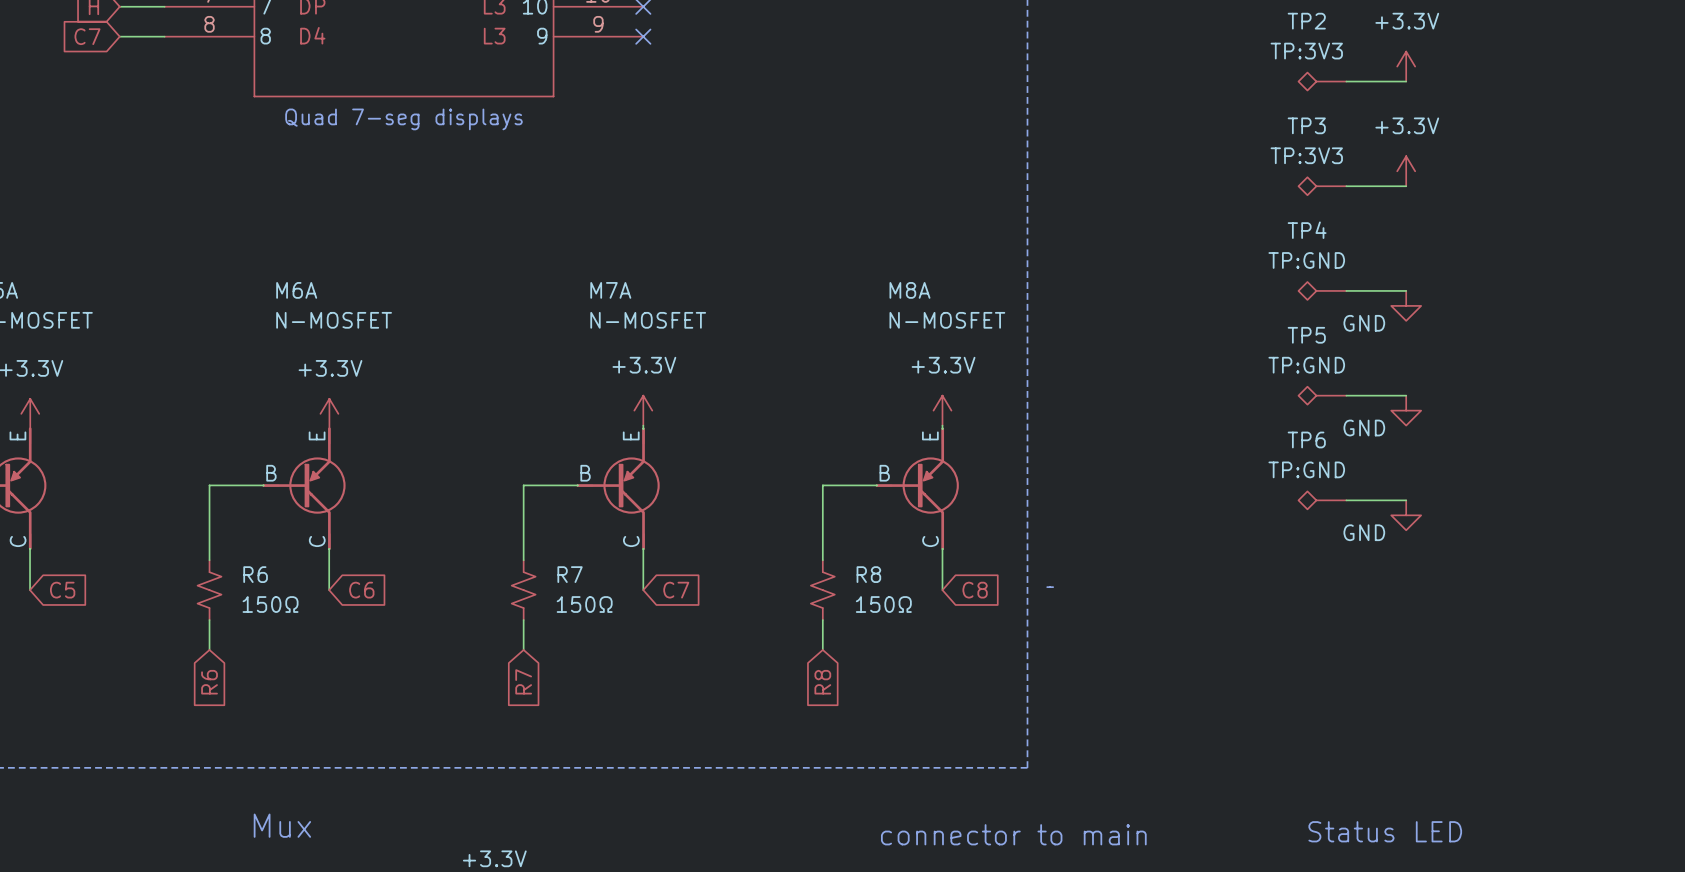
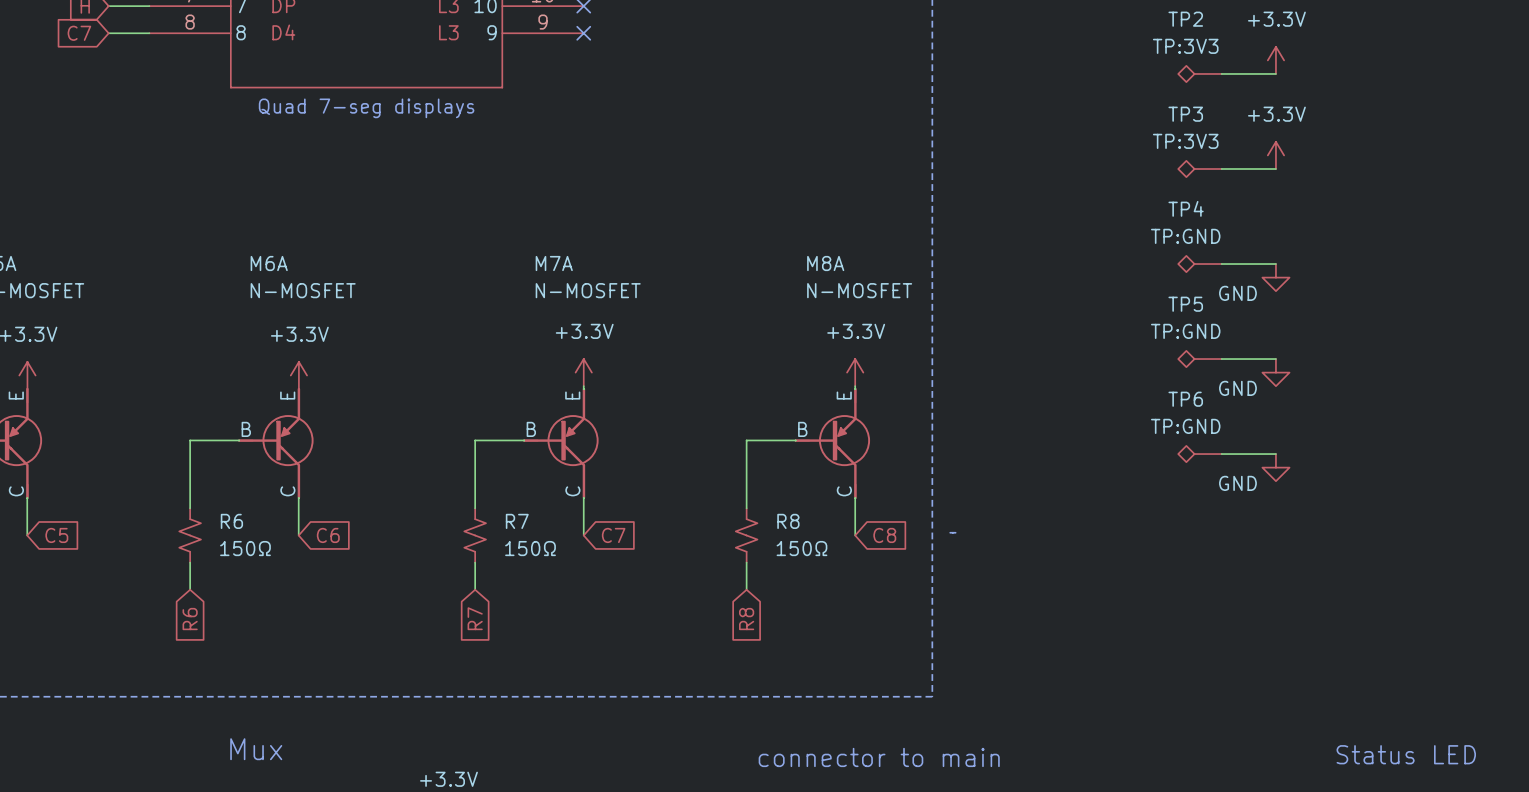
text position: Status LED (1385, 831) -> Status LED (1406, 754)
text position: connector to main (1013, 834) -> connector to main (879, 757)

